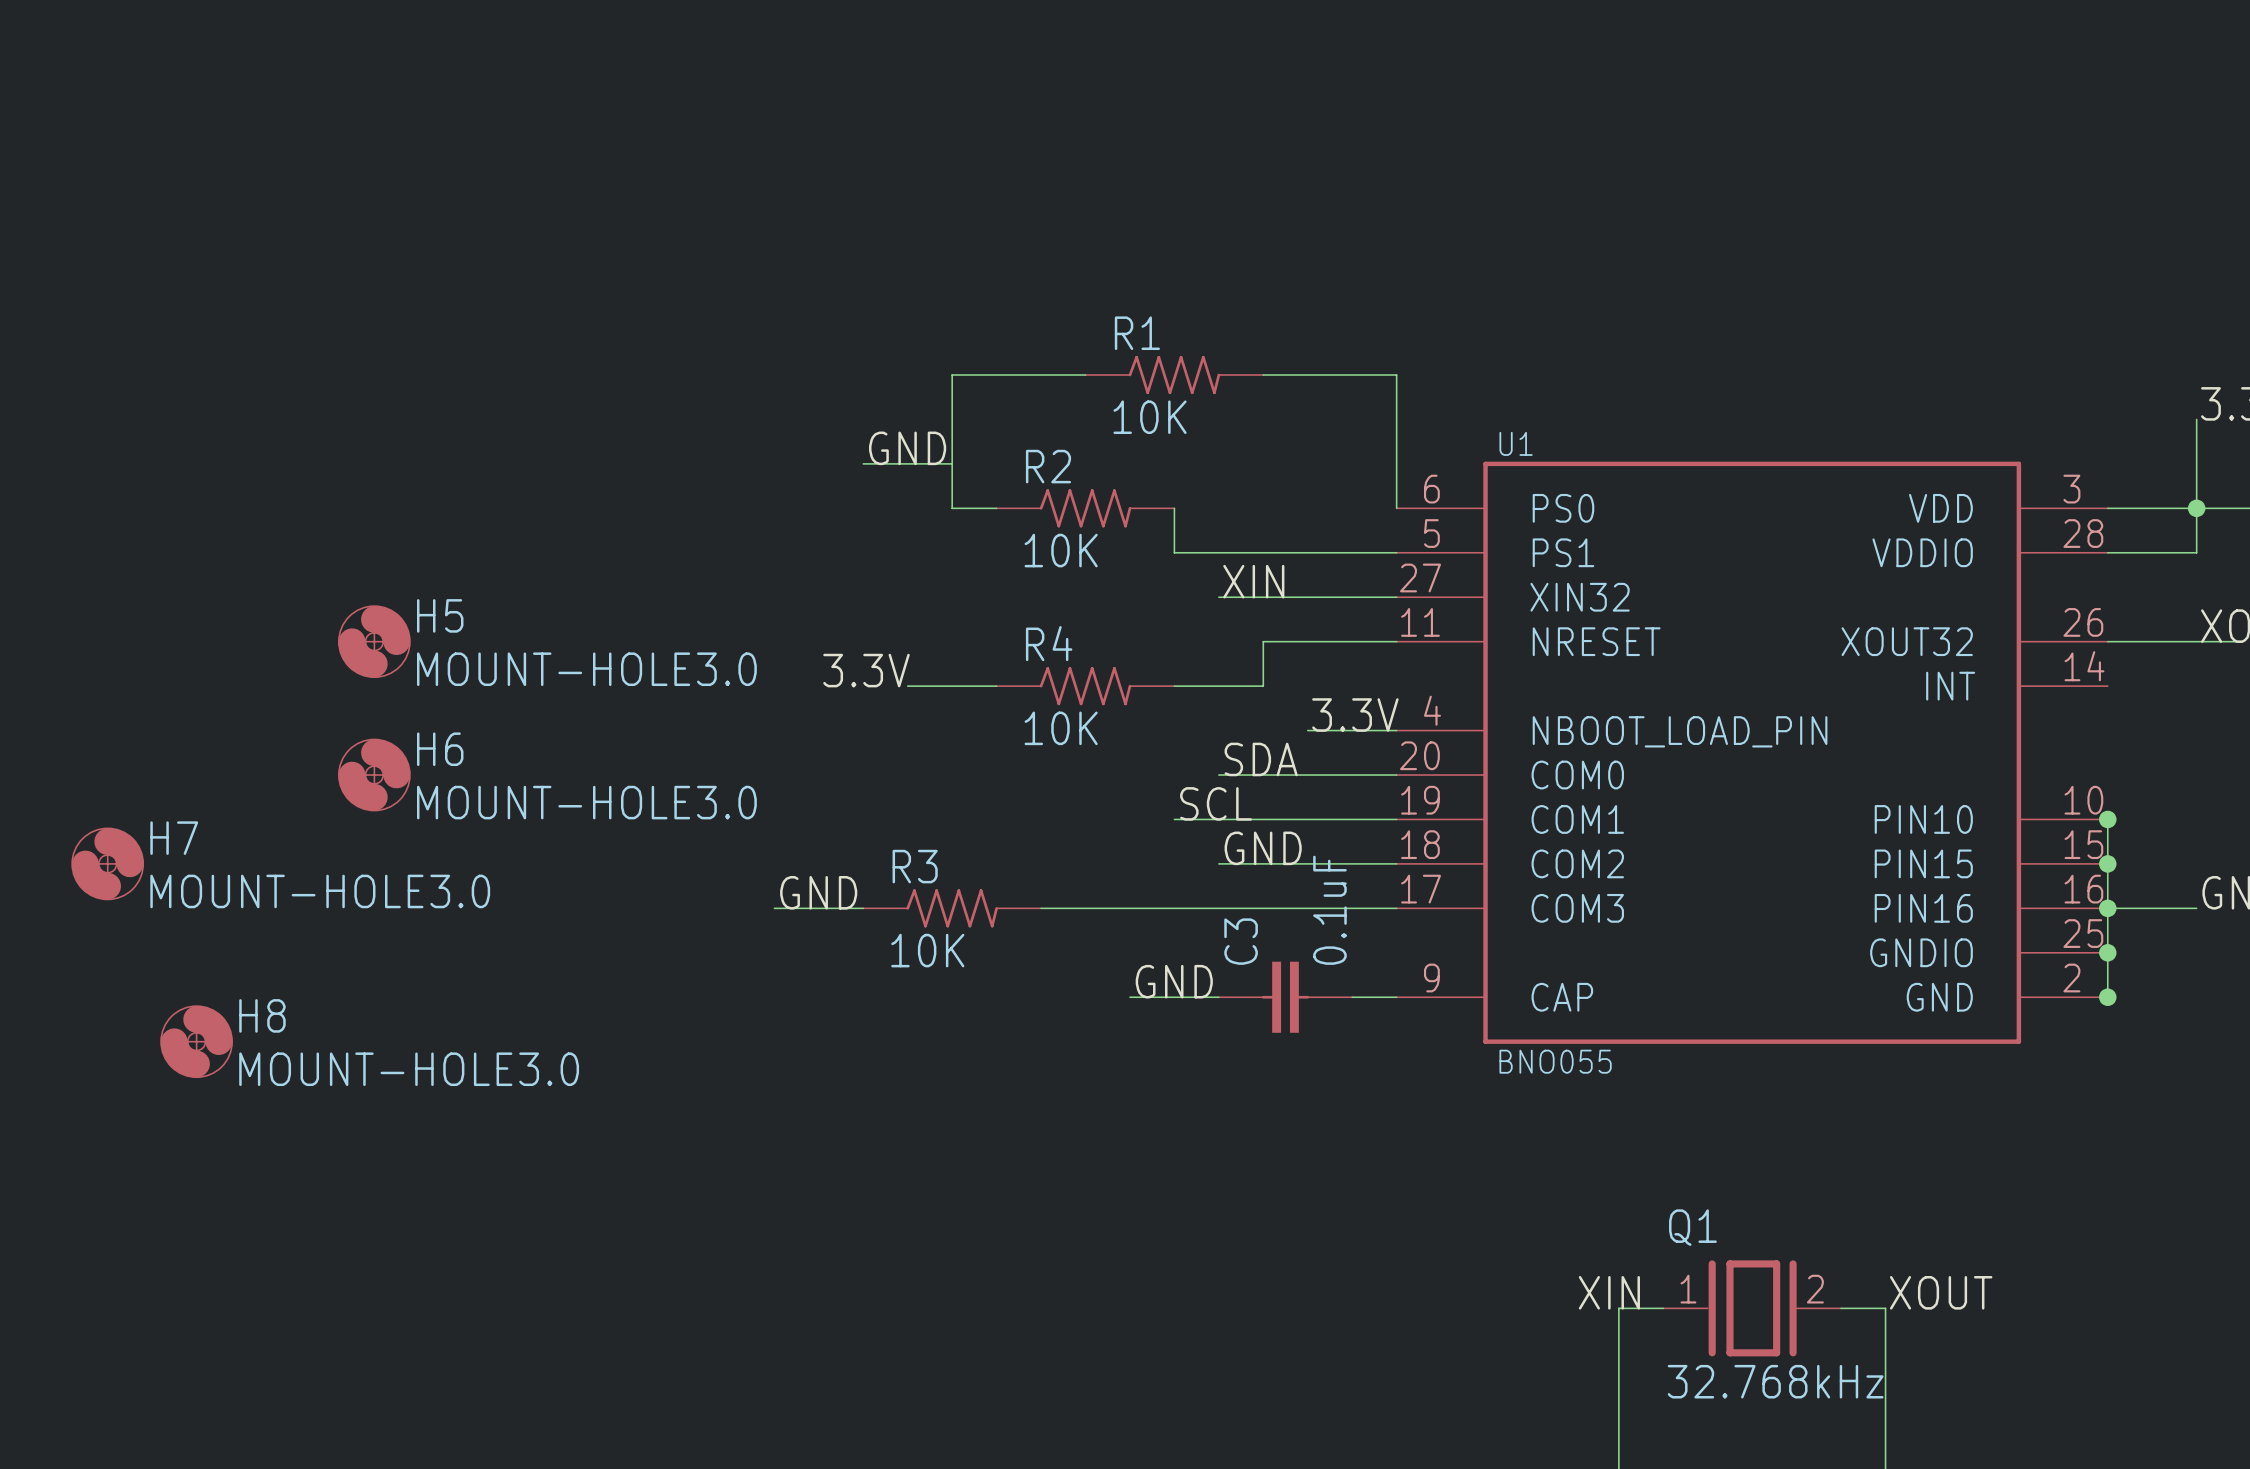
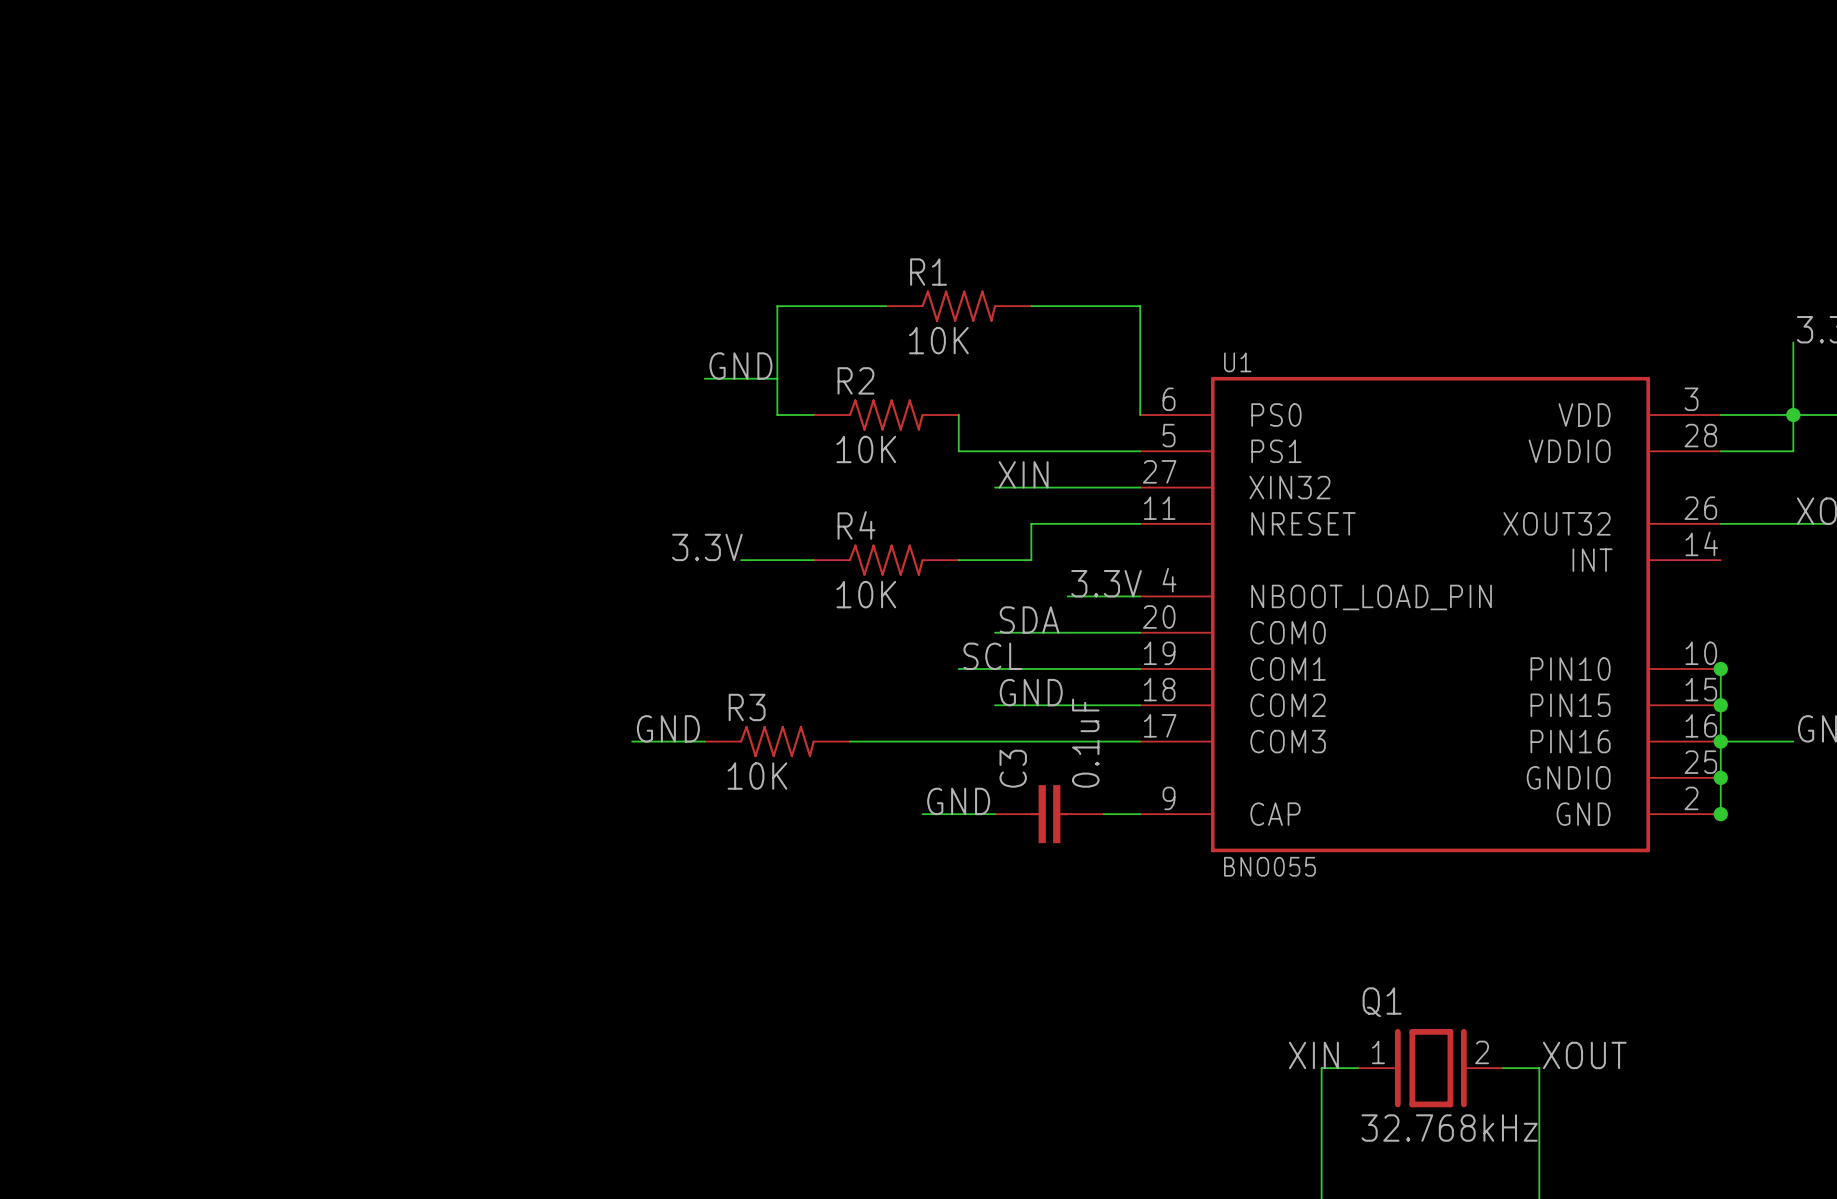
H5: MOUNT-HOLE3.0 (374, 641) -> none
H6: MOUNT-HOLE3.0 (374, 775) -> none
H7: MOUNT-HOLE3.0 (107, 863) -> none
H8: MOUNT-HOLE3.0 (196, 1041) -> none

